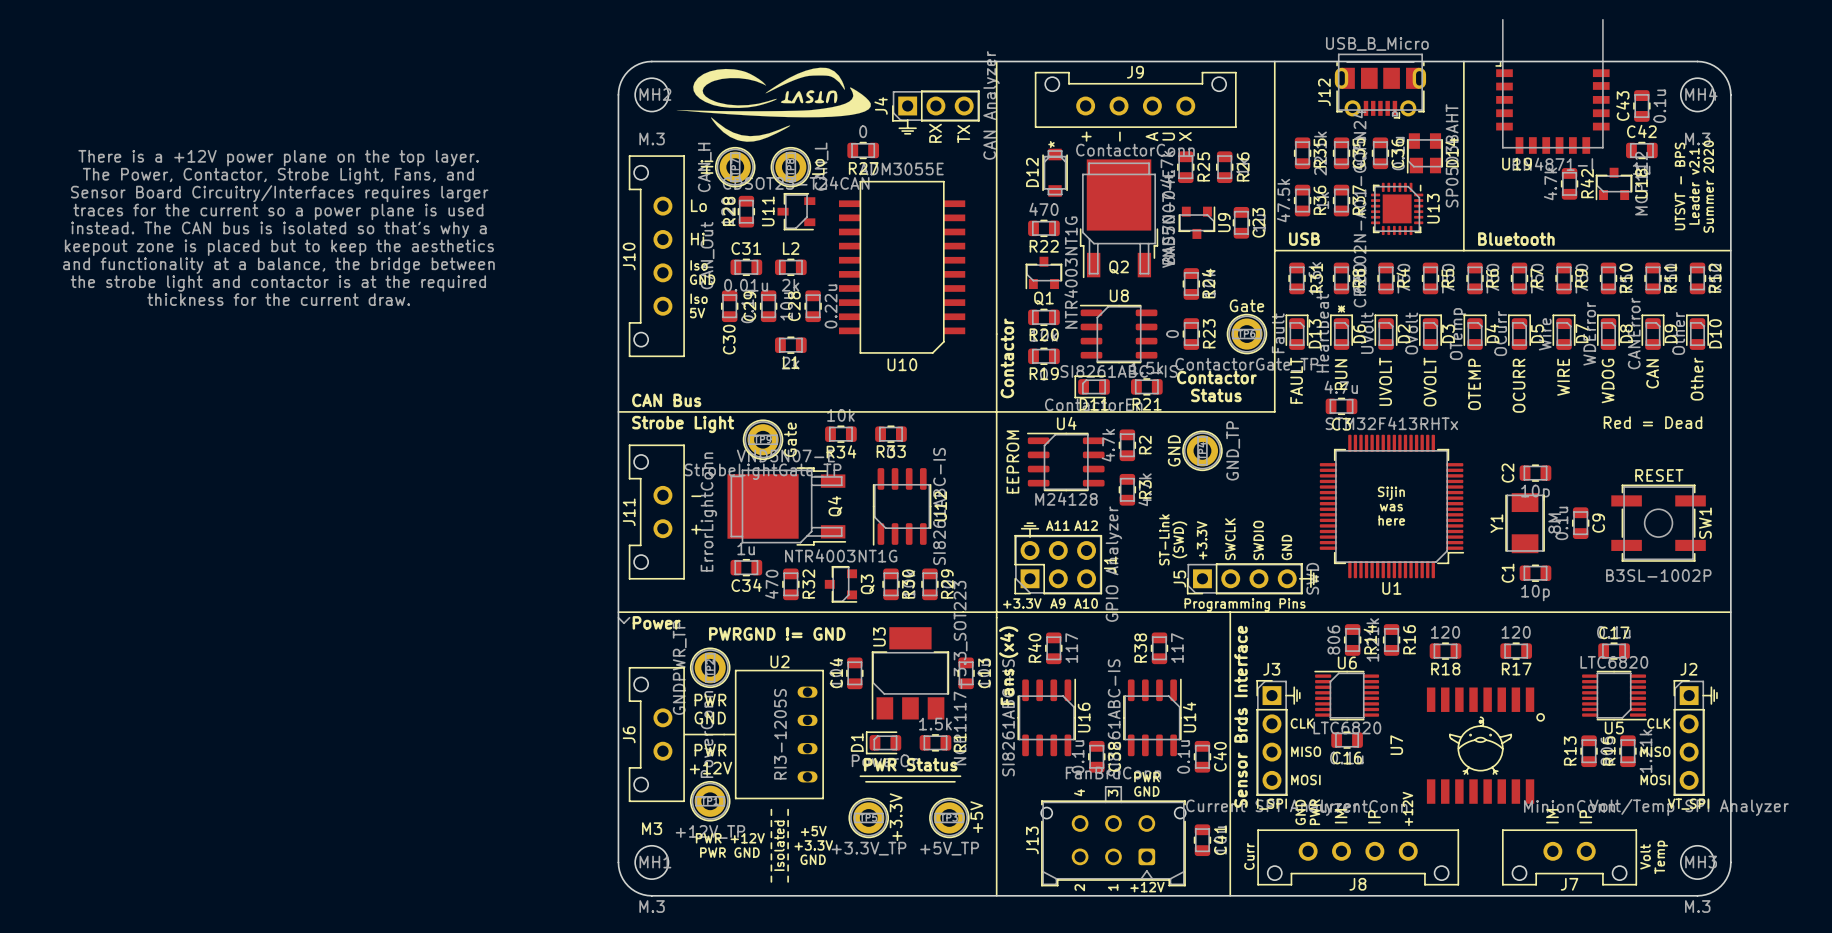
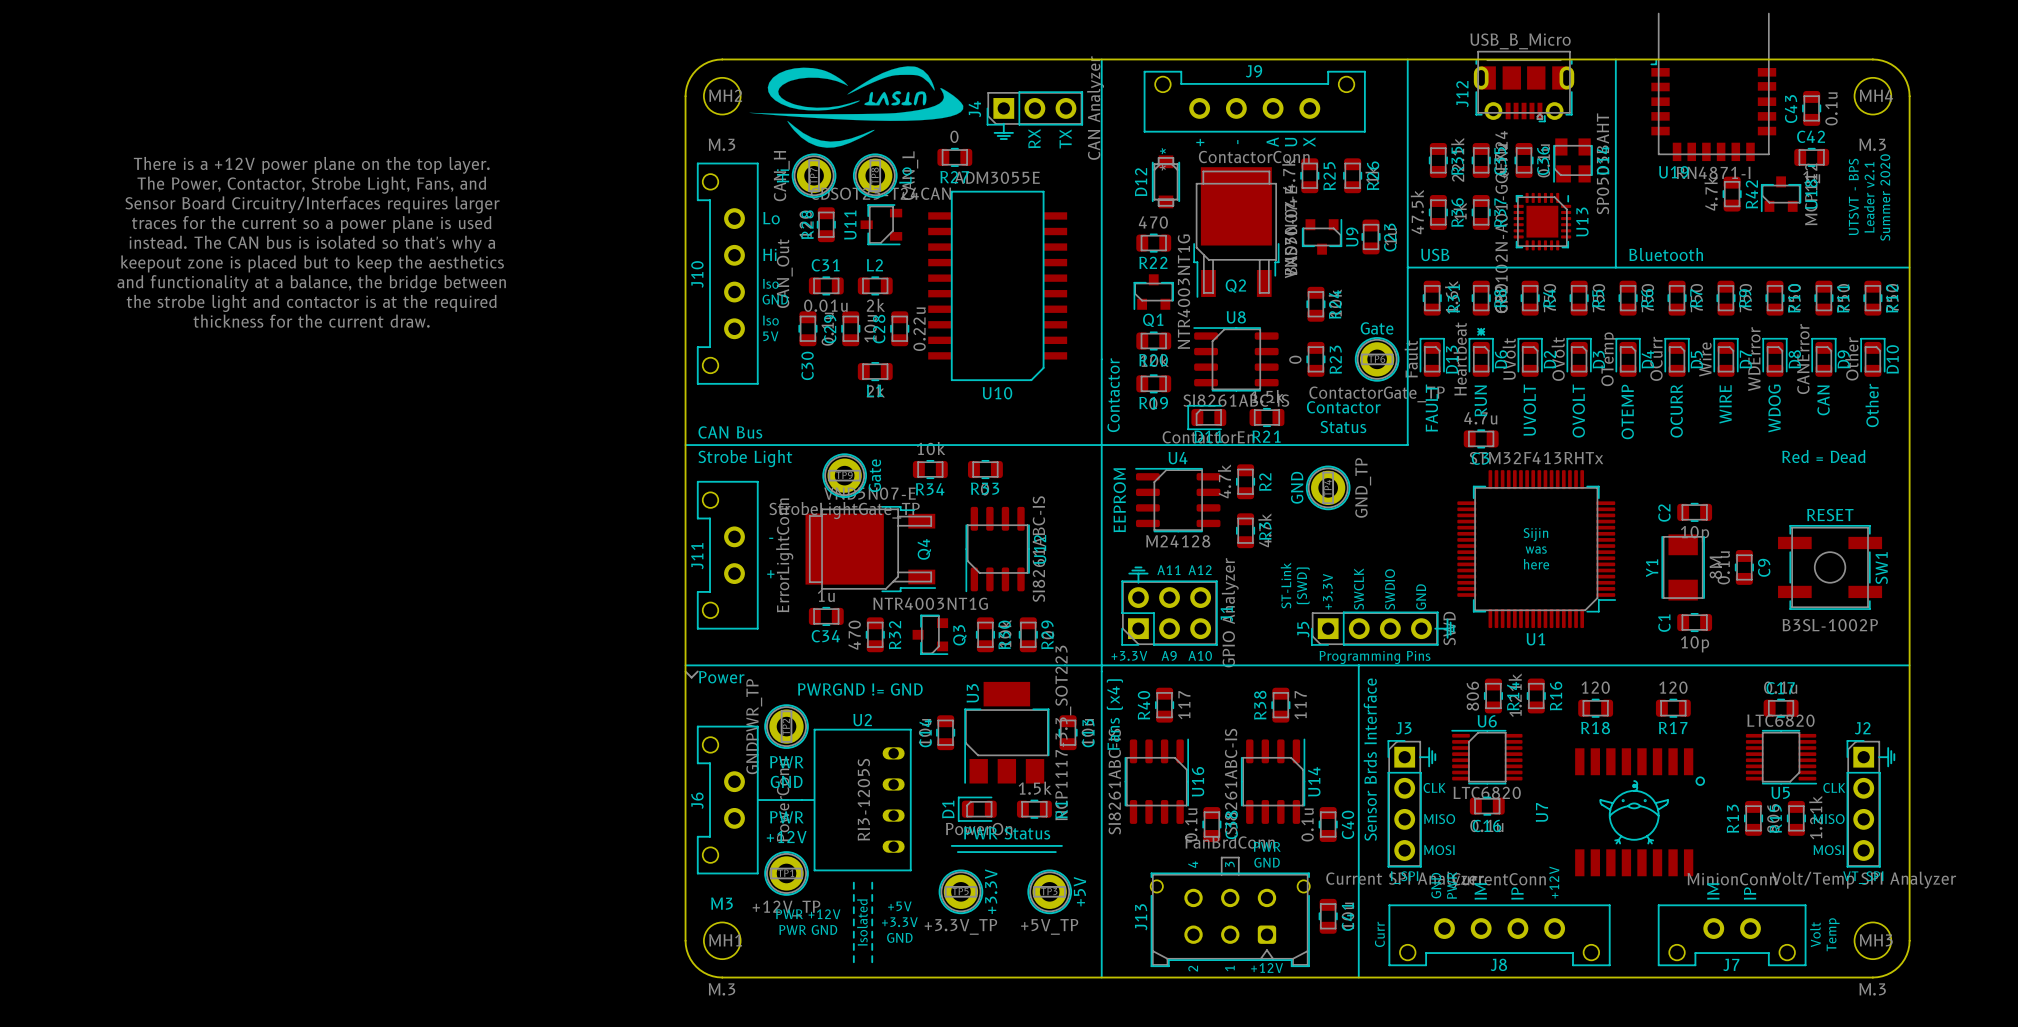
D12 text: none -> * (1162, 167)

